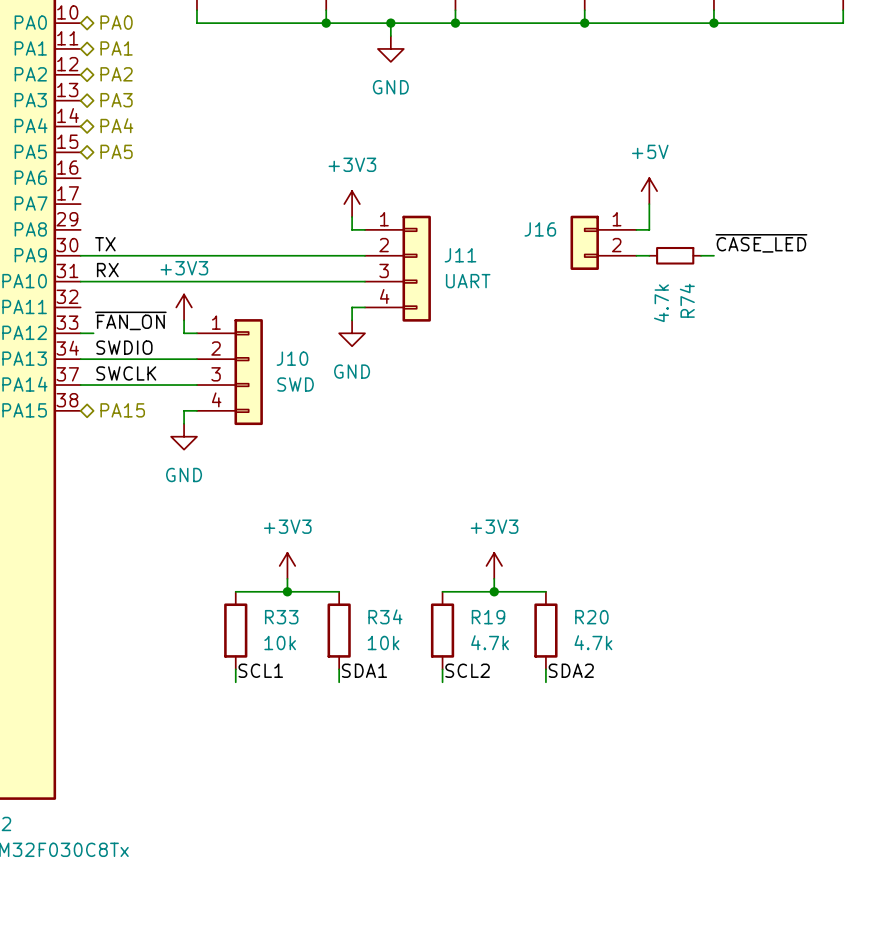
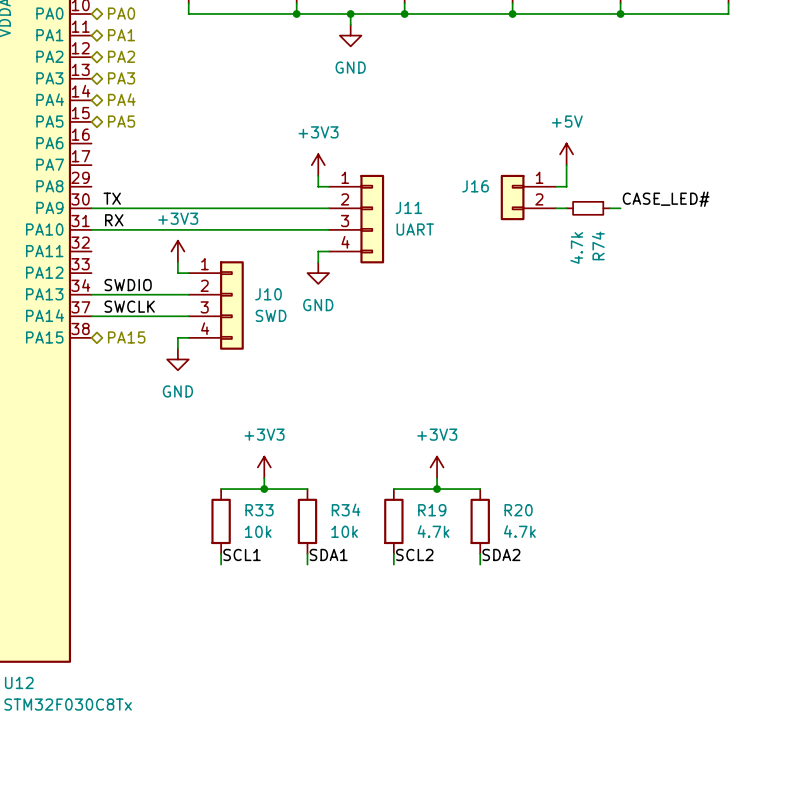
label: ~{CASE_LED} (761, 243) -> CASE_LED# (666, 199)
label: ~{FAN_ON} (130, 320) -> none
wire: (80, 333) (93, 333) -> none

